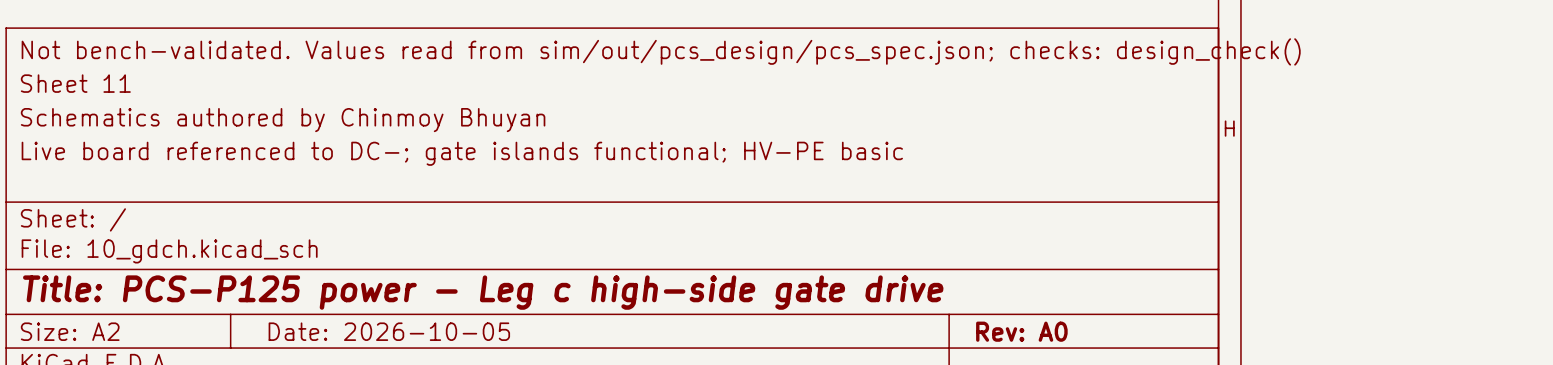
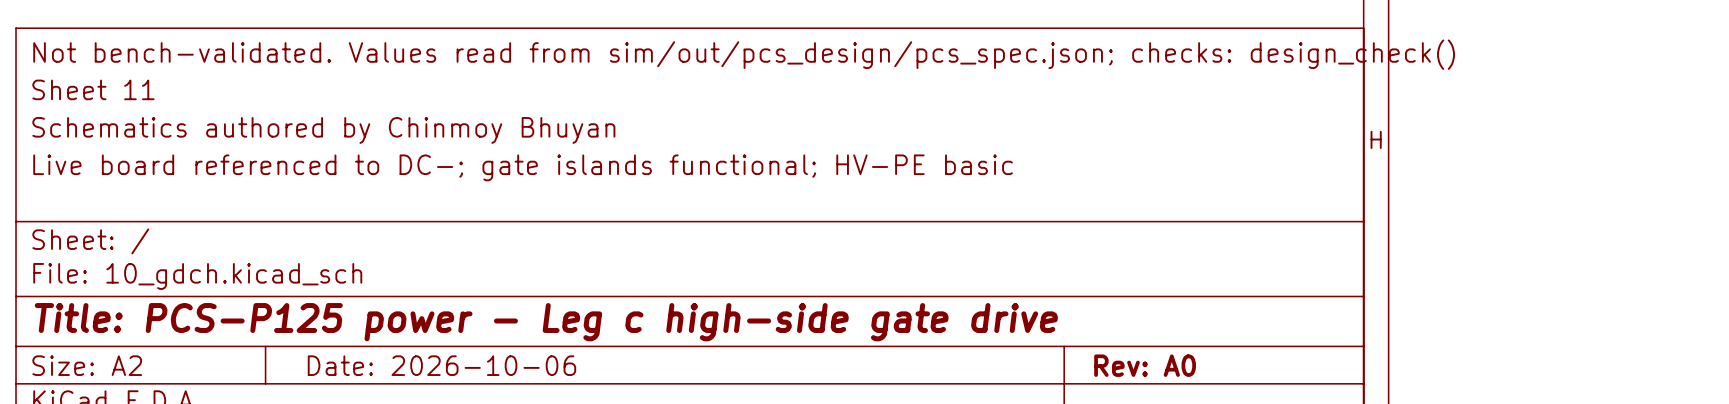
title block: Date: 2026-10-05 (389, 331) -> Date: 2026-10-06 (441, 365)

